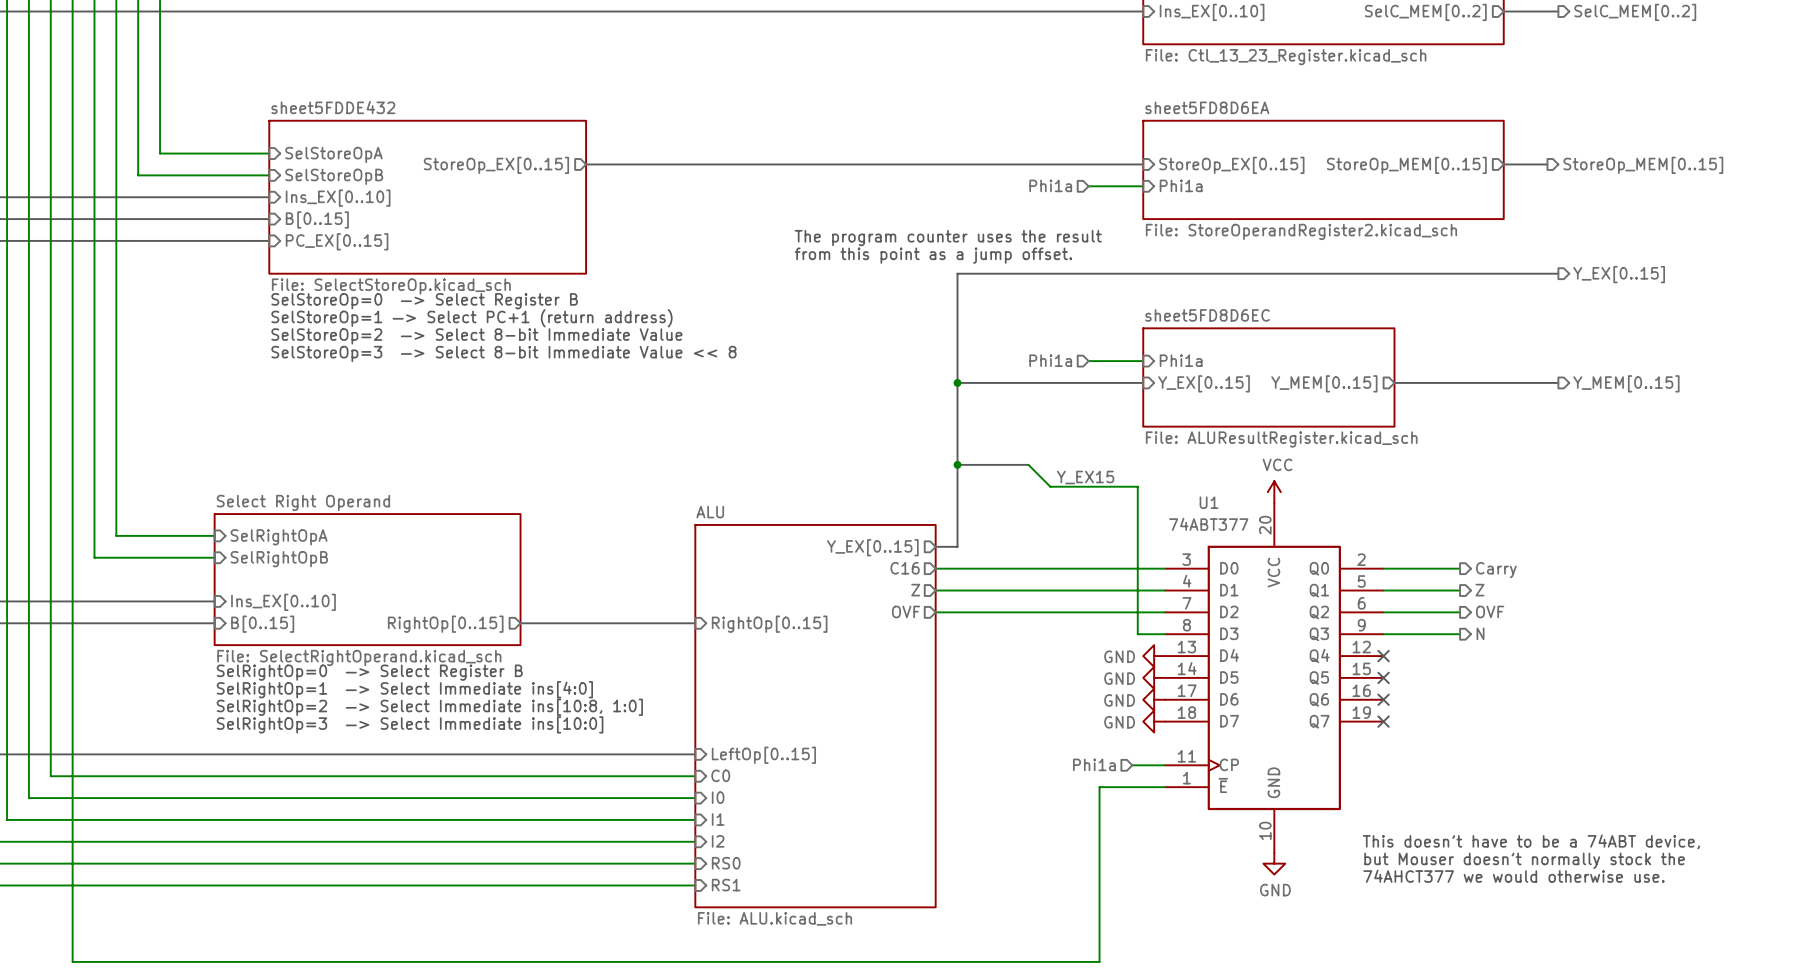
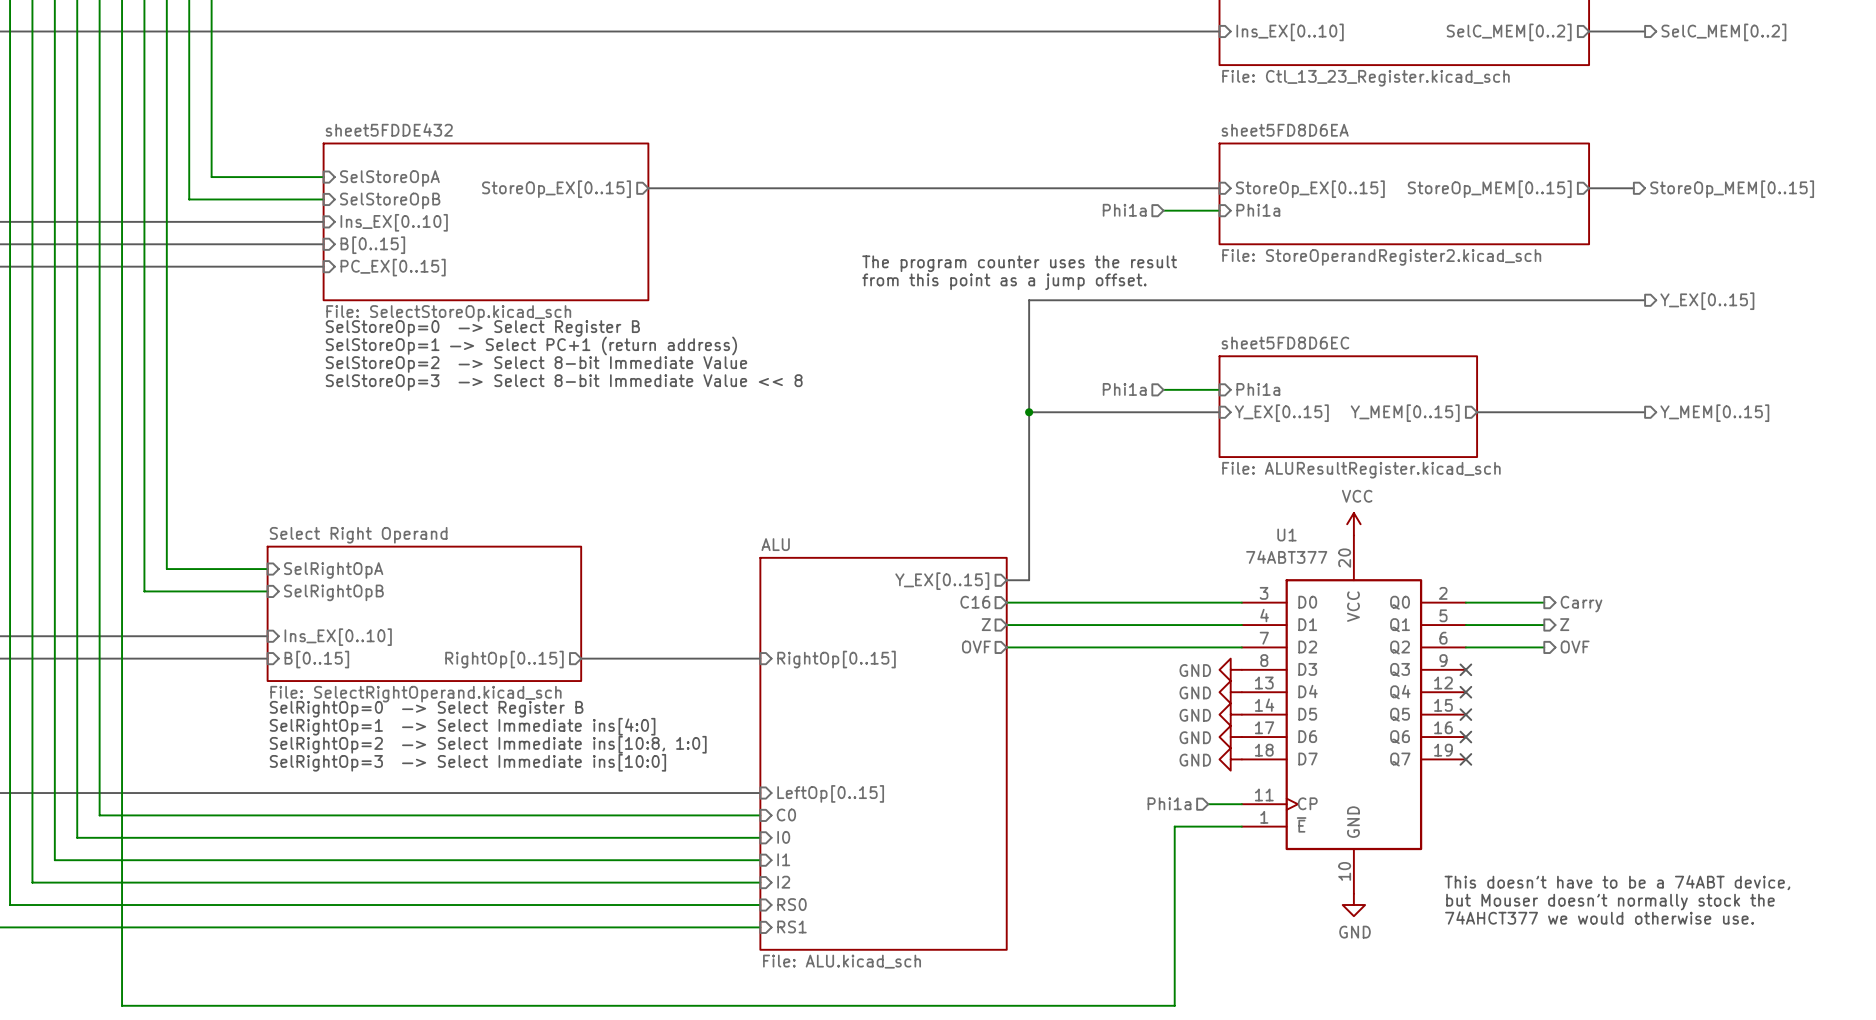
bus: (957, 464) (1028, 464) -> none
junction: (957, 464) -> none
wire: (1028, 464) (1050, 486) -> none
label: Y_EX15 (1085, 477) -> none
wire: (1050, 486) (1137, 486) (1137, 634) (1165, 634) -> none
hierarchical label: N (1480, 633) -> none
power symbol: none -> GND (1230, 669)
wire: (1383, 634) (1460, 634) -> none
no-connect mark: none -> (1465, 669)

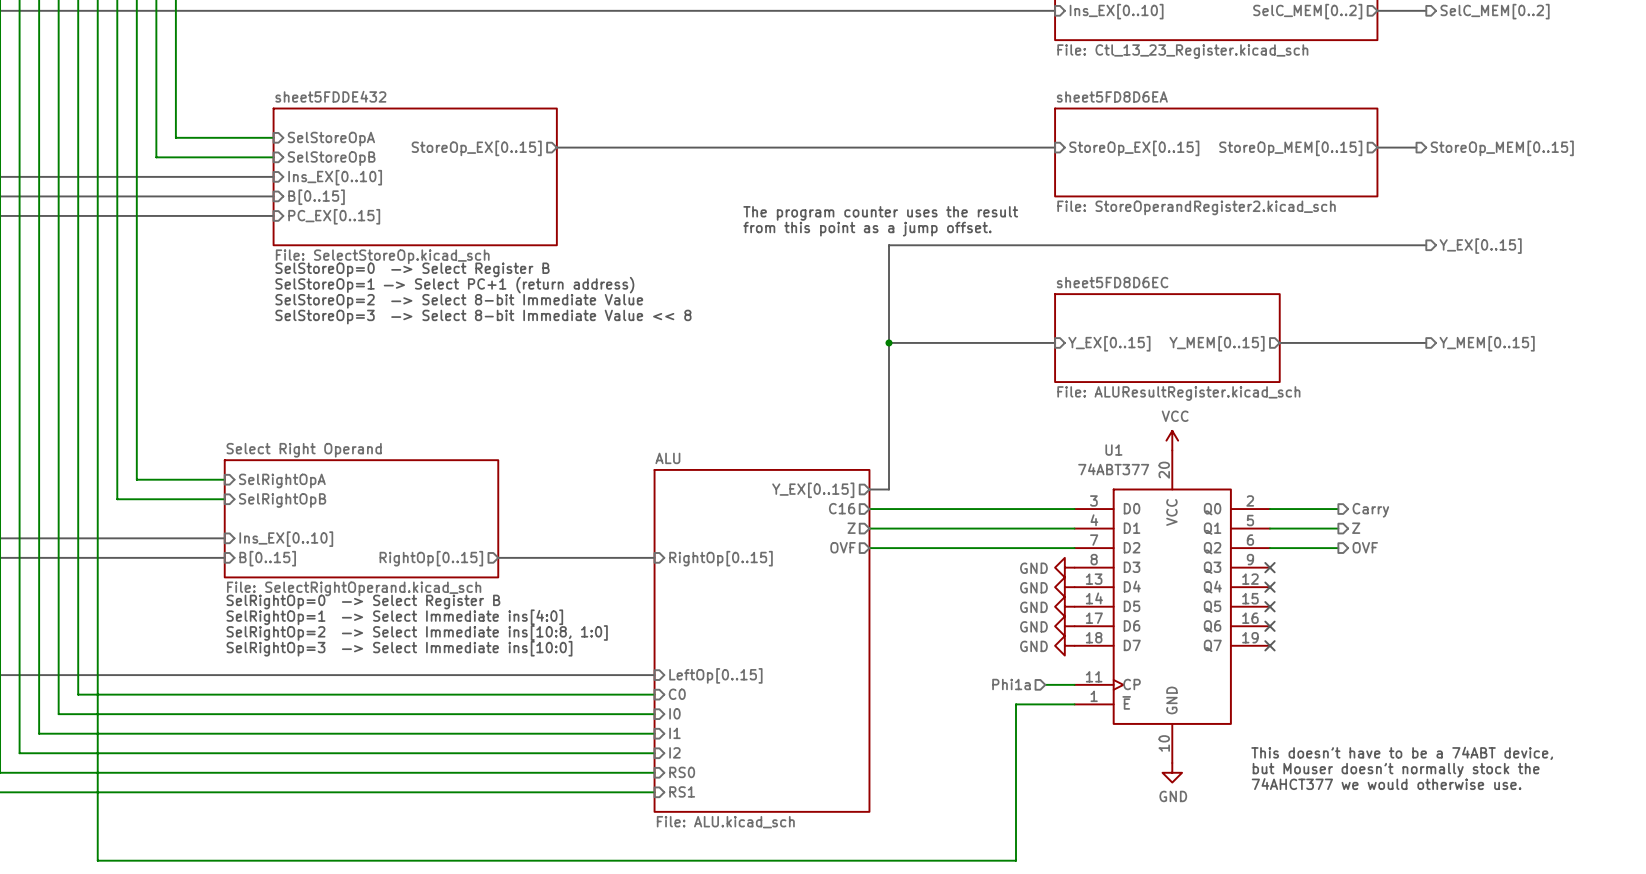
hierarchical label: Phi1a (1124, 210) -> none
wire: (1163, 210) (1219, 210) -> none
sheet pin: Phi1a (1258, 210) -> none
hierarchical label: Phi1a (1124, 389) -> none
wire: (1163, 389) (1219, 389) -> none
sheet pin: Phi1a (1258, 389) -> none

